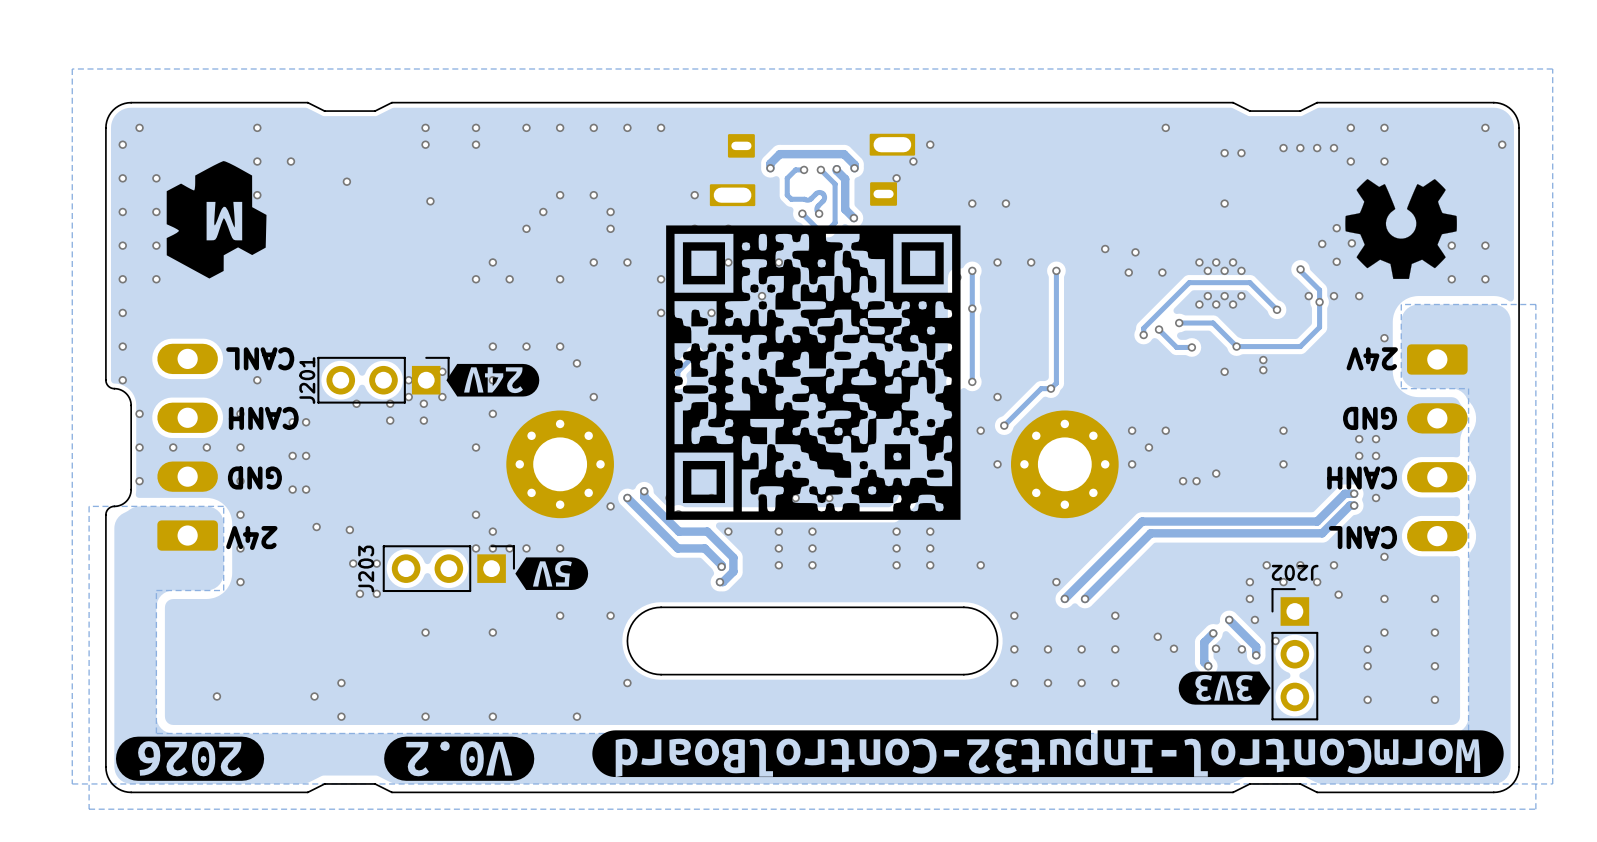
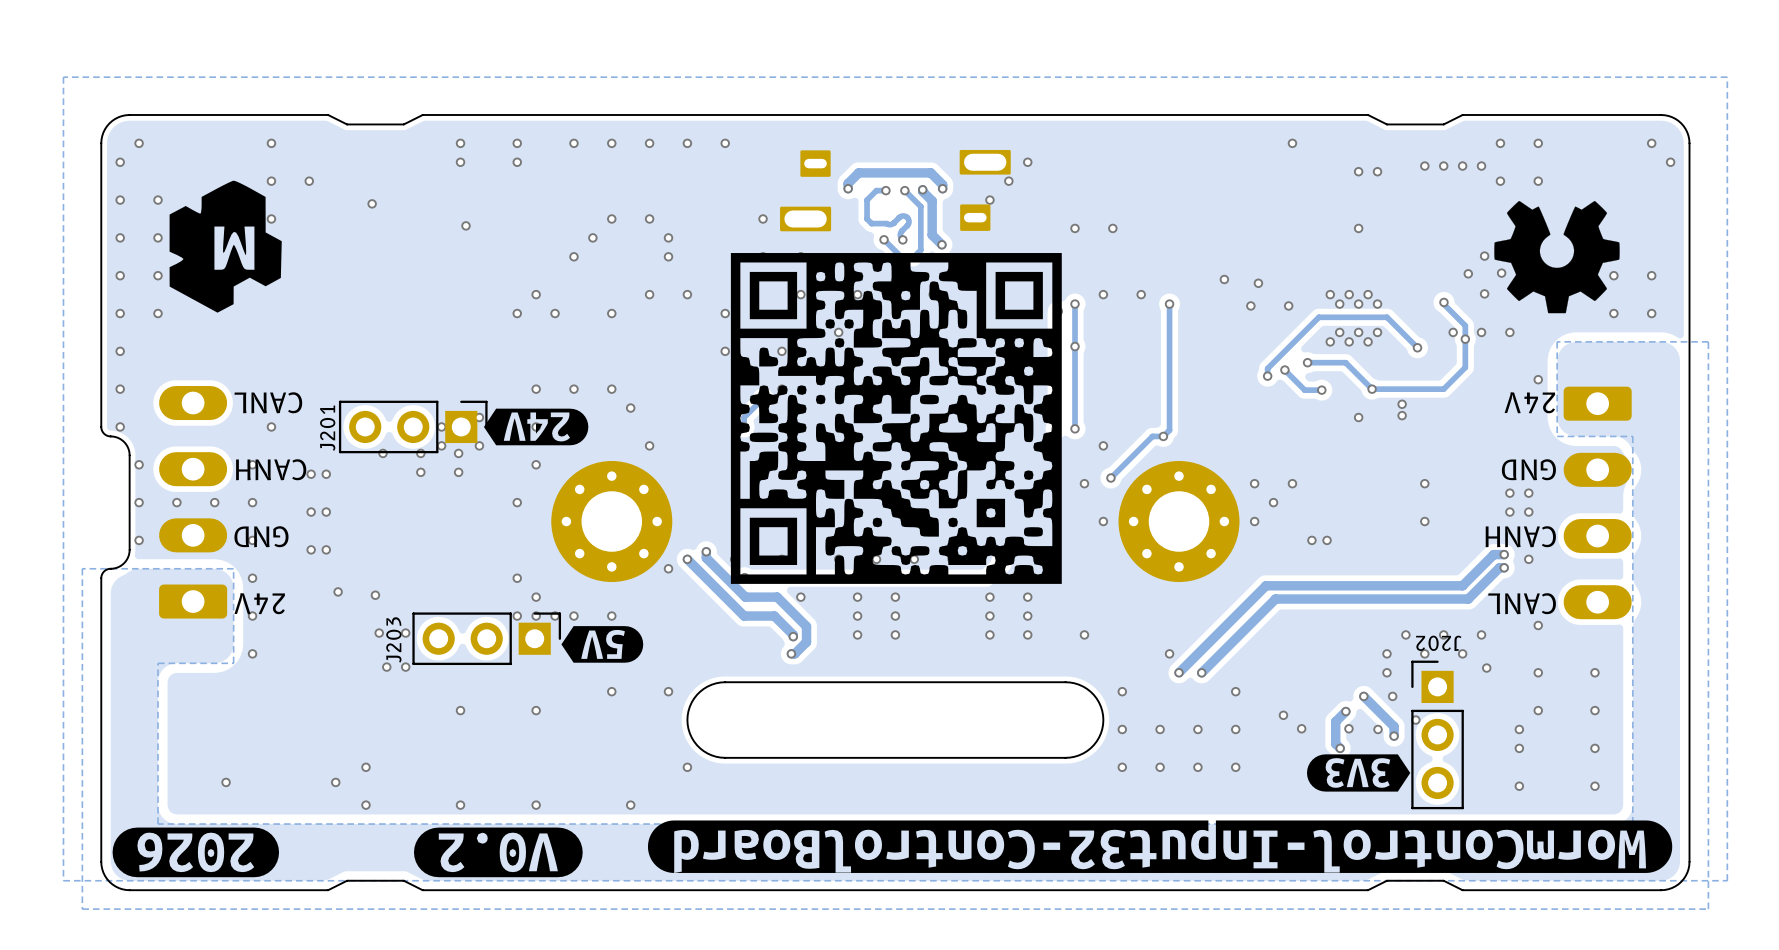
via: (1216, 473) -> none

